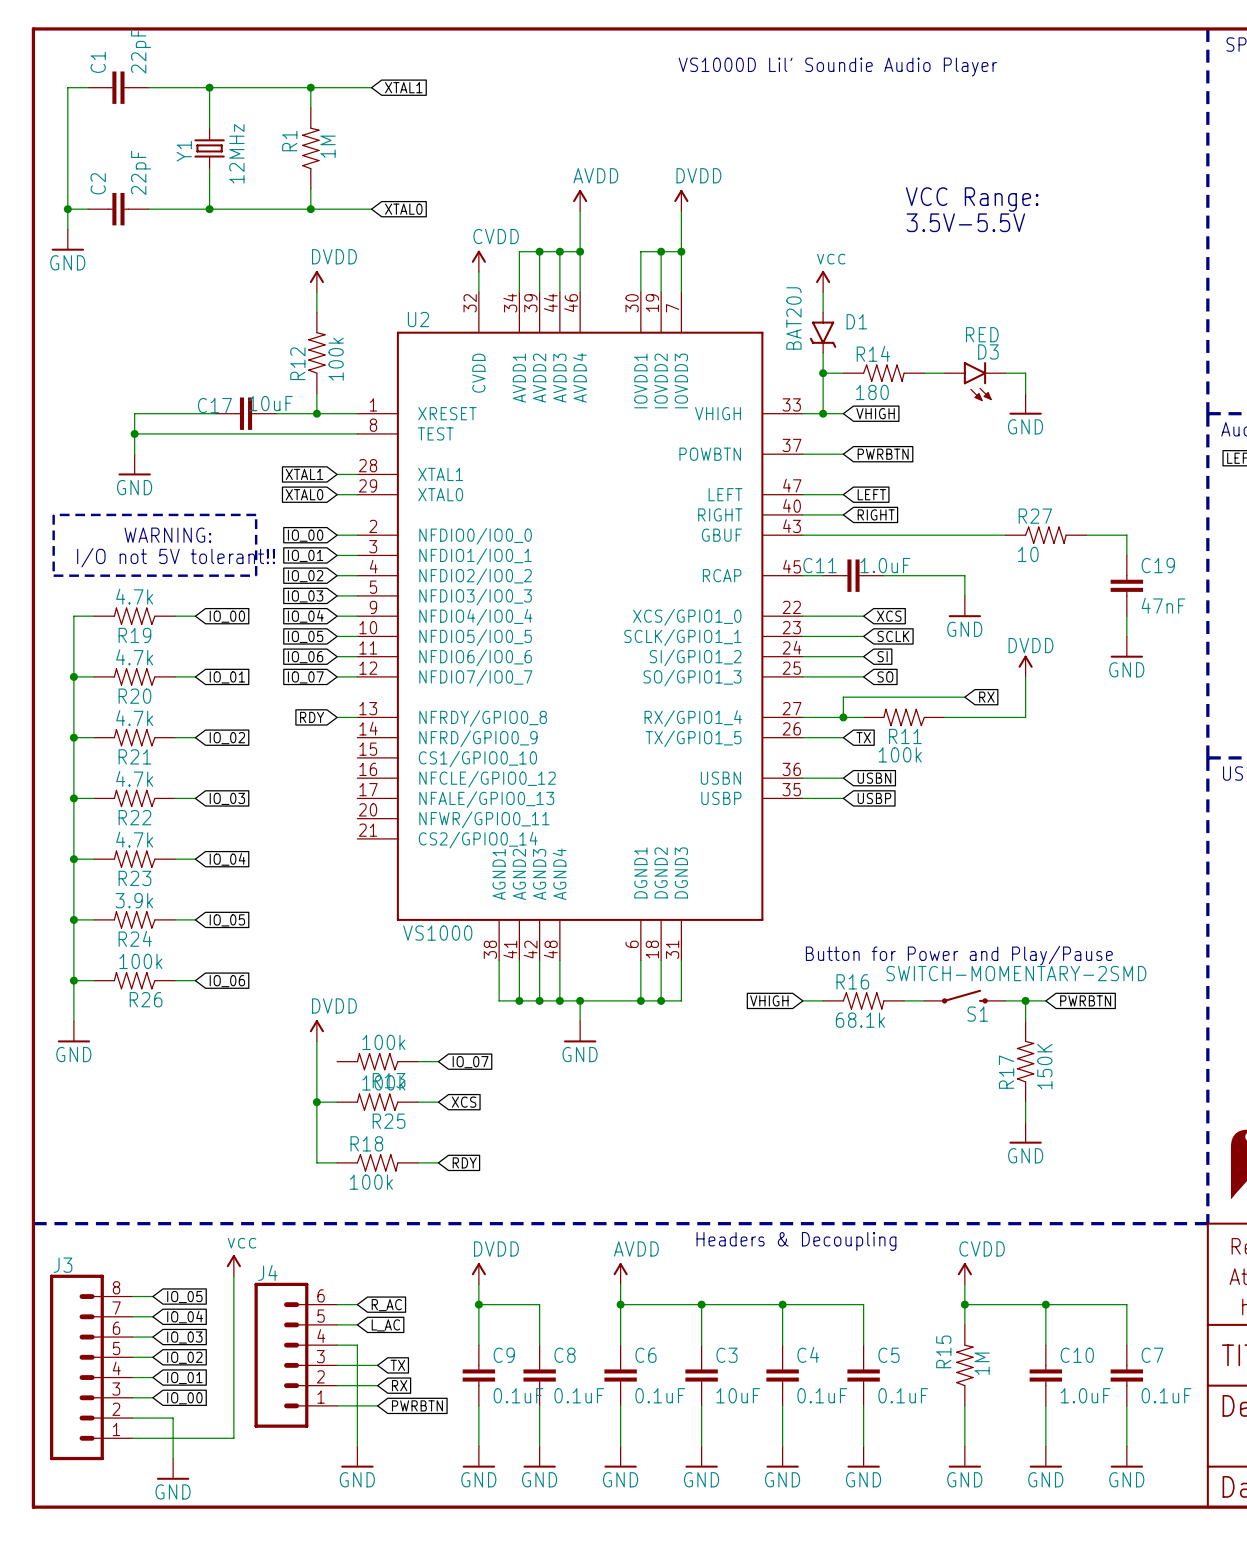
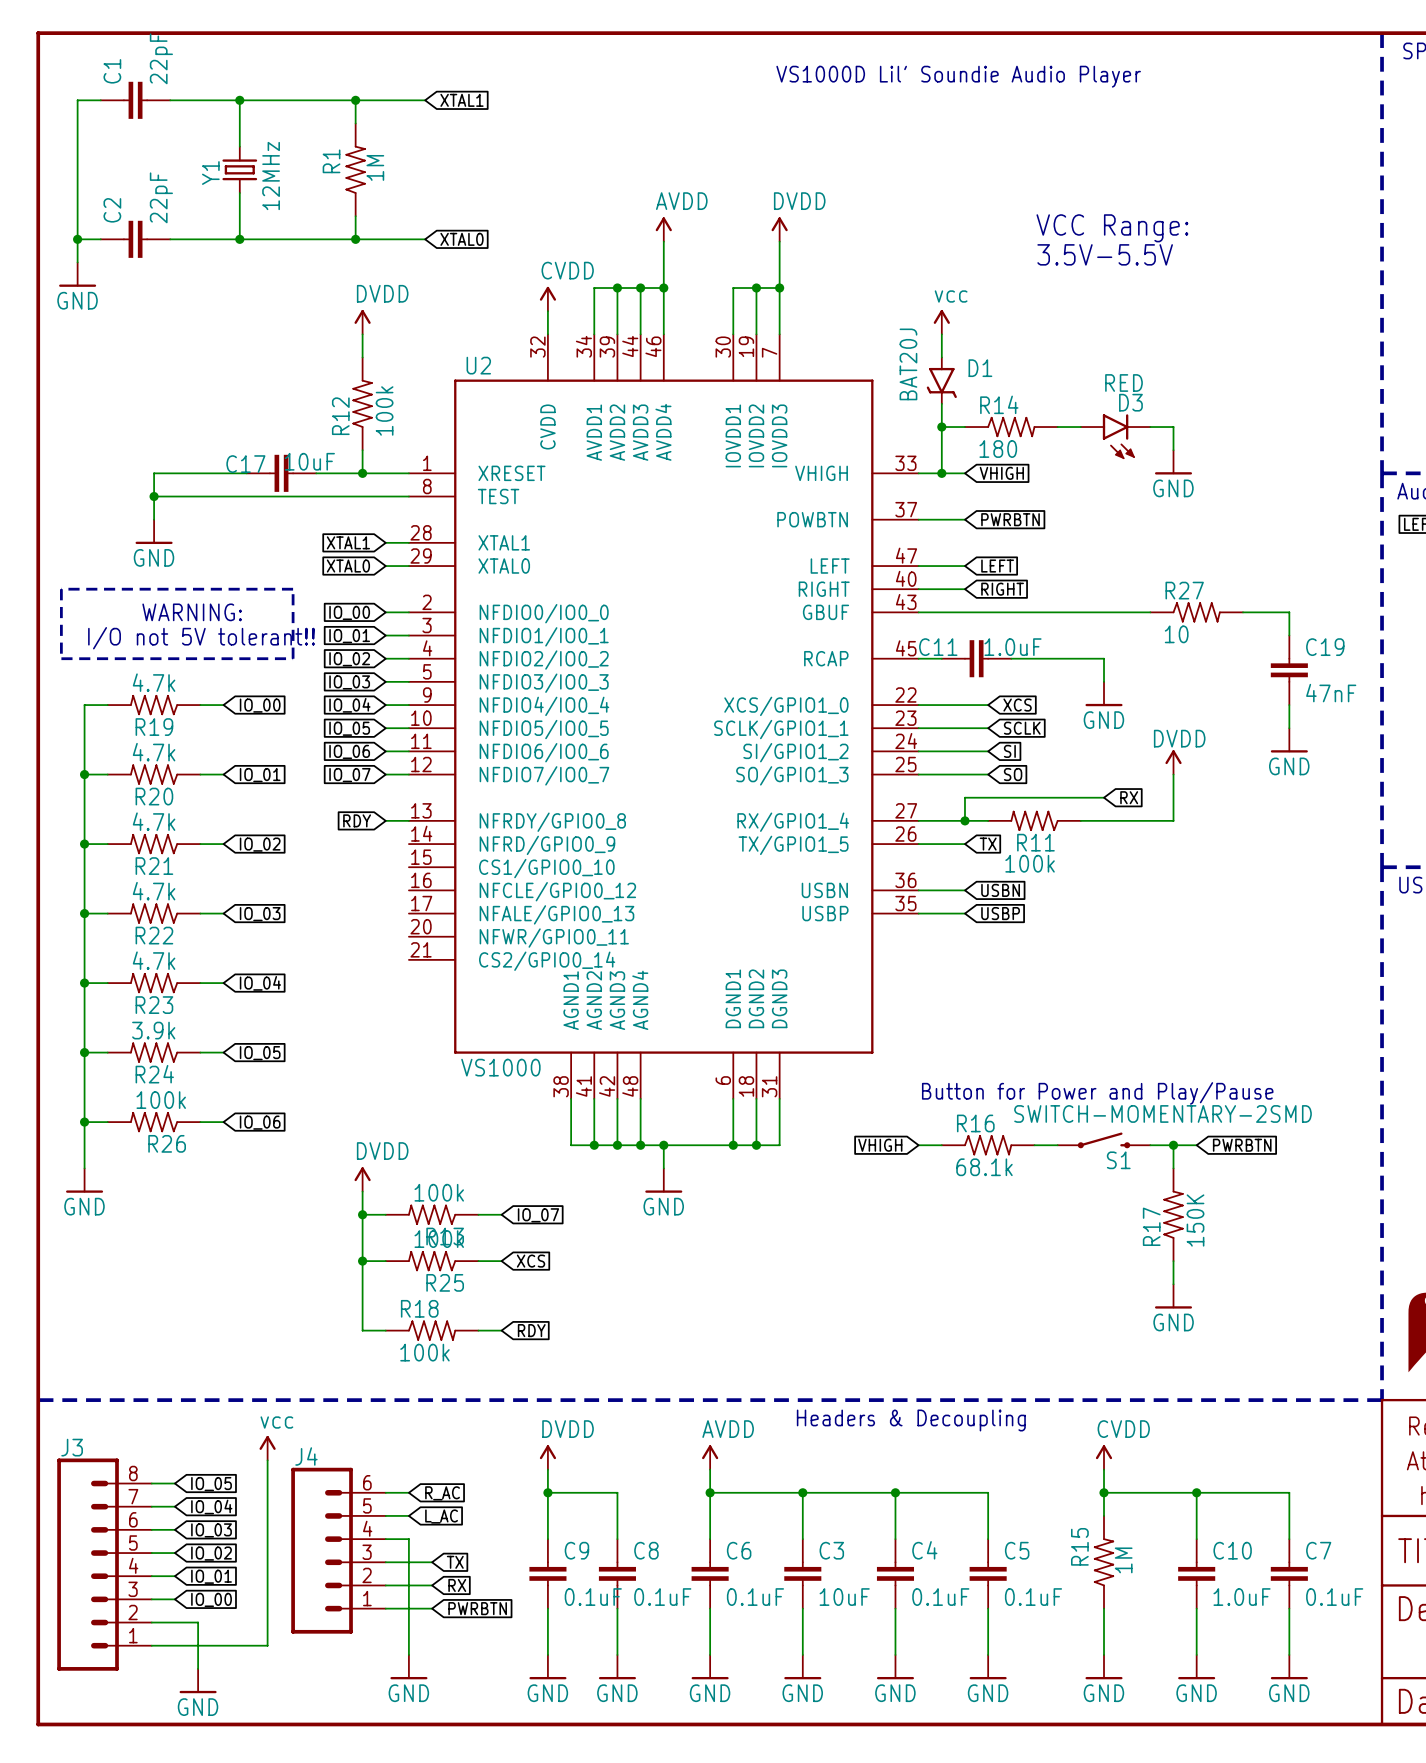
wire: none -> (362, 1214) (385, 1214)
junction: none -> (362, 1214)

